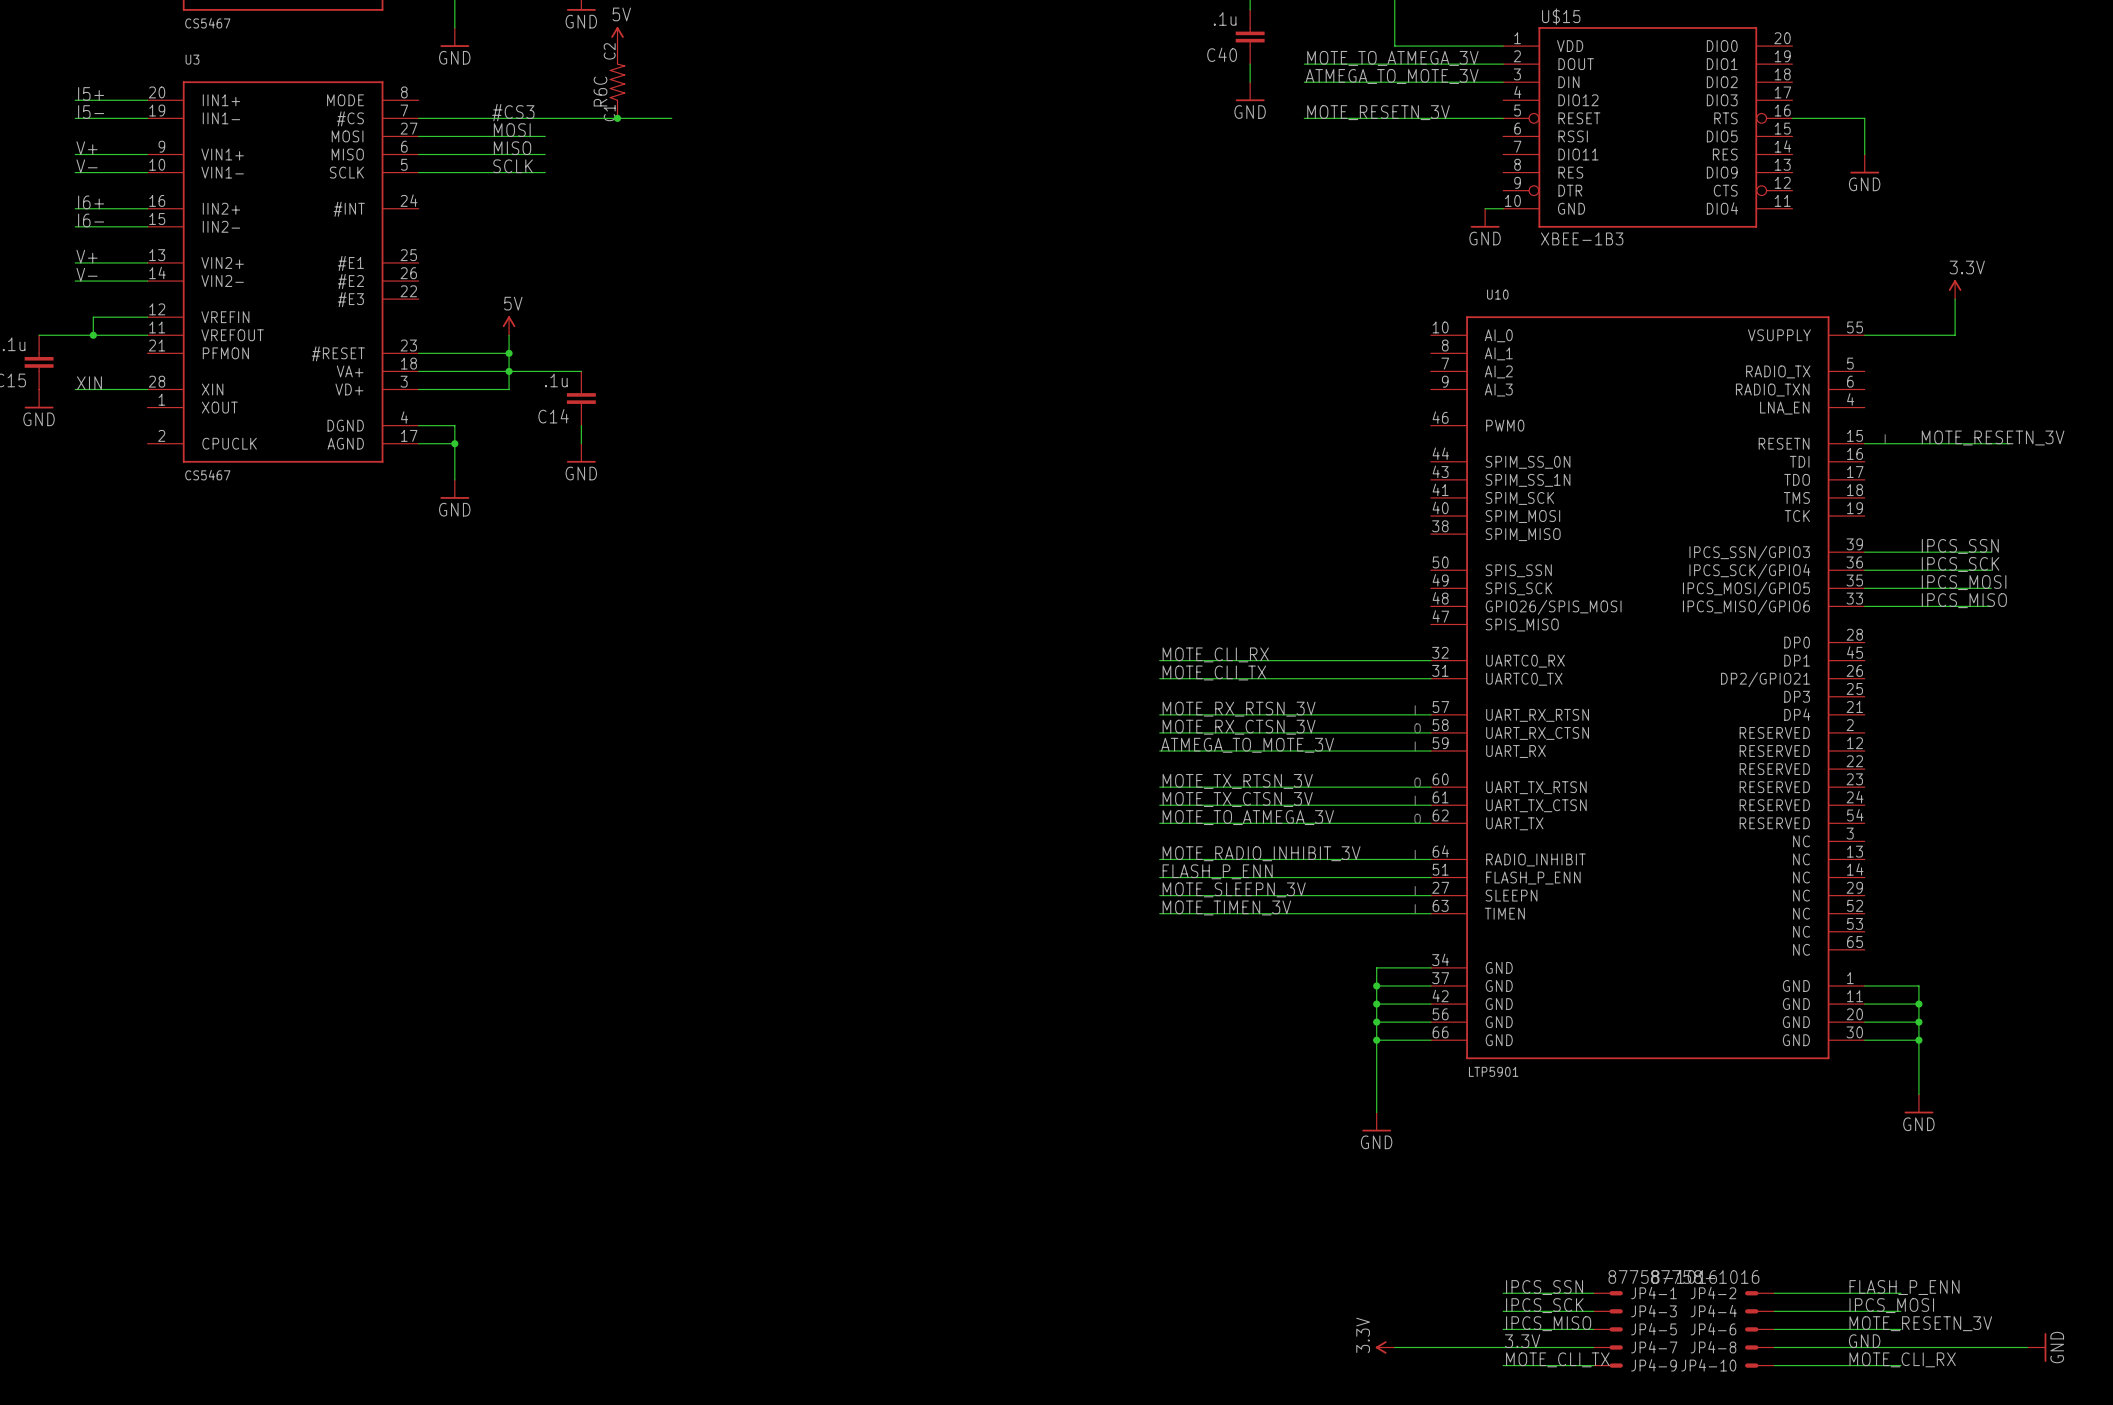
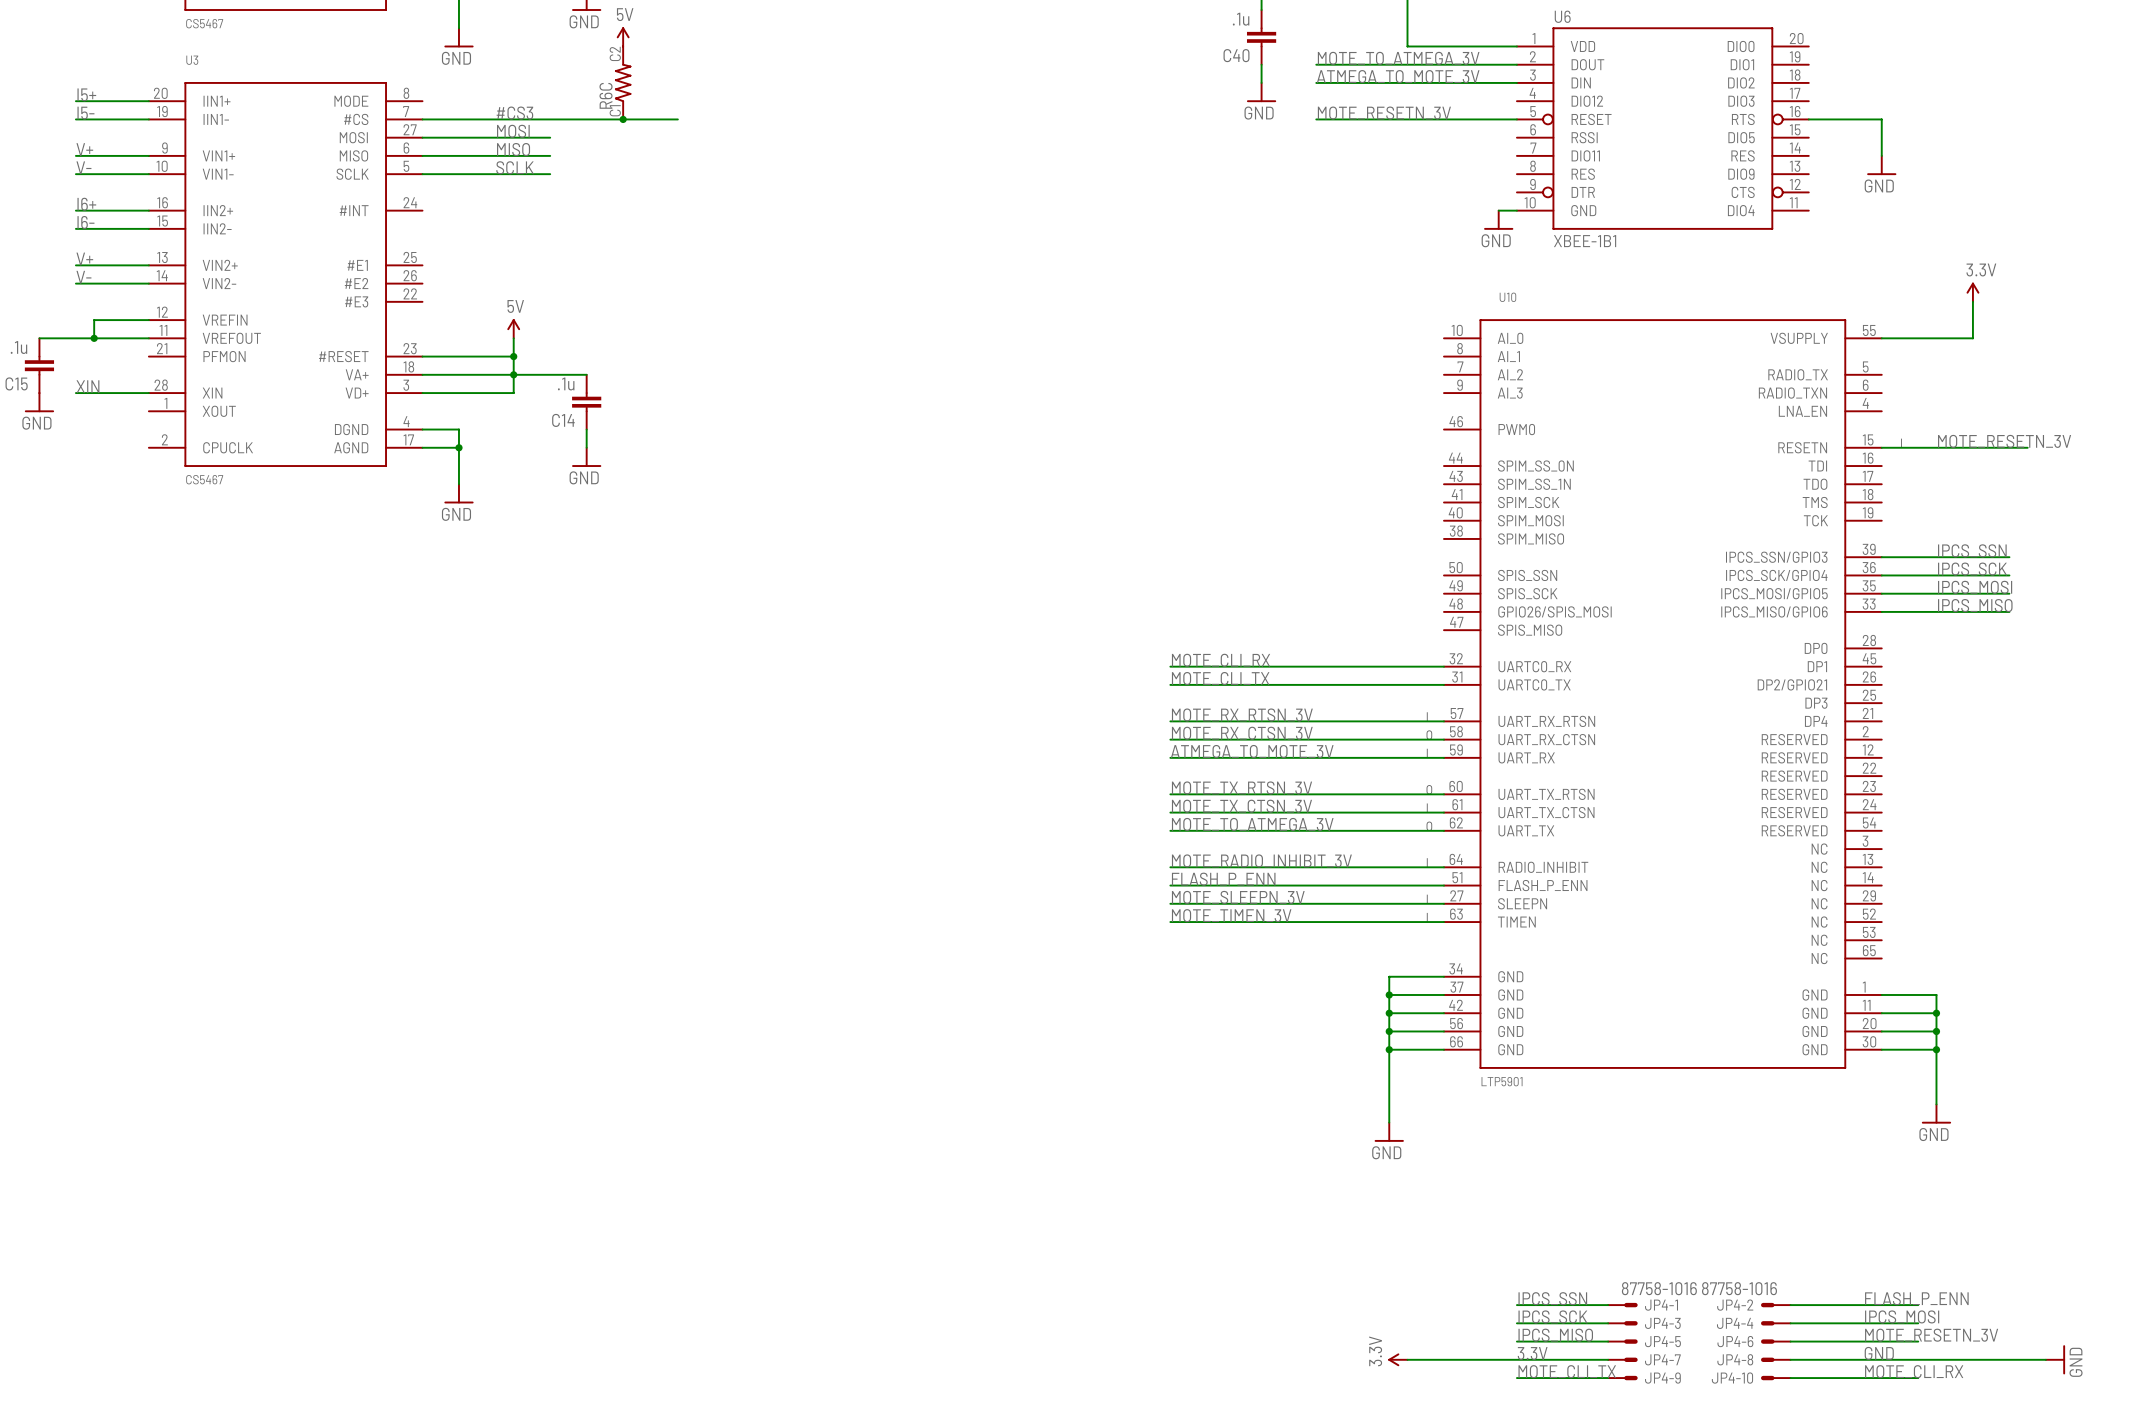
U$15 name: U$15 (1561, 16) -> U6 (1562, 16)
U$15 value: XBEE-1B3 (1582, 238) -> XBEE-1B1 (1585, 241)

